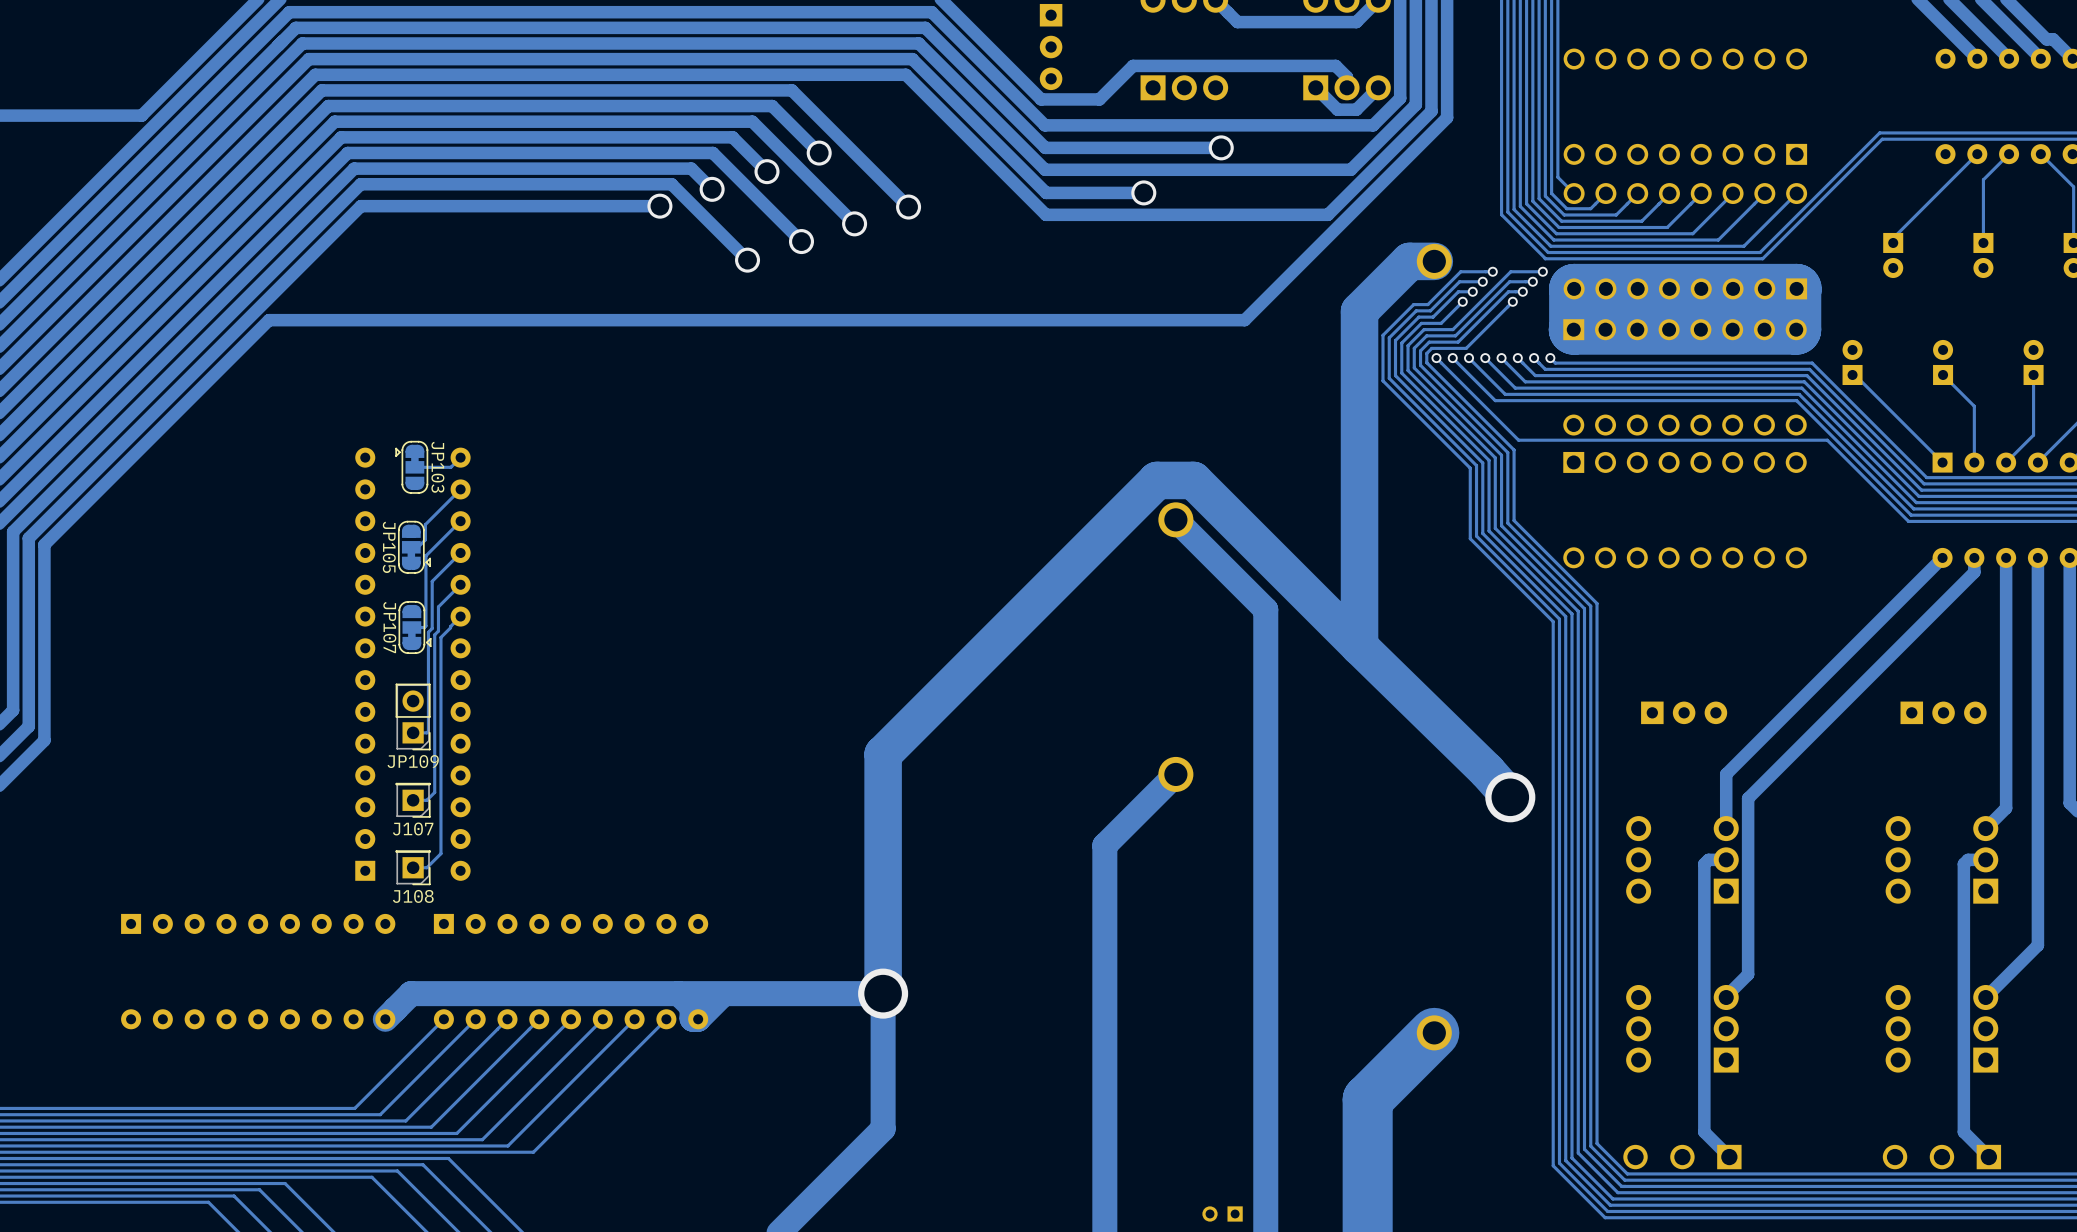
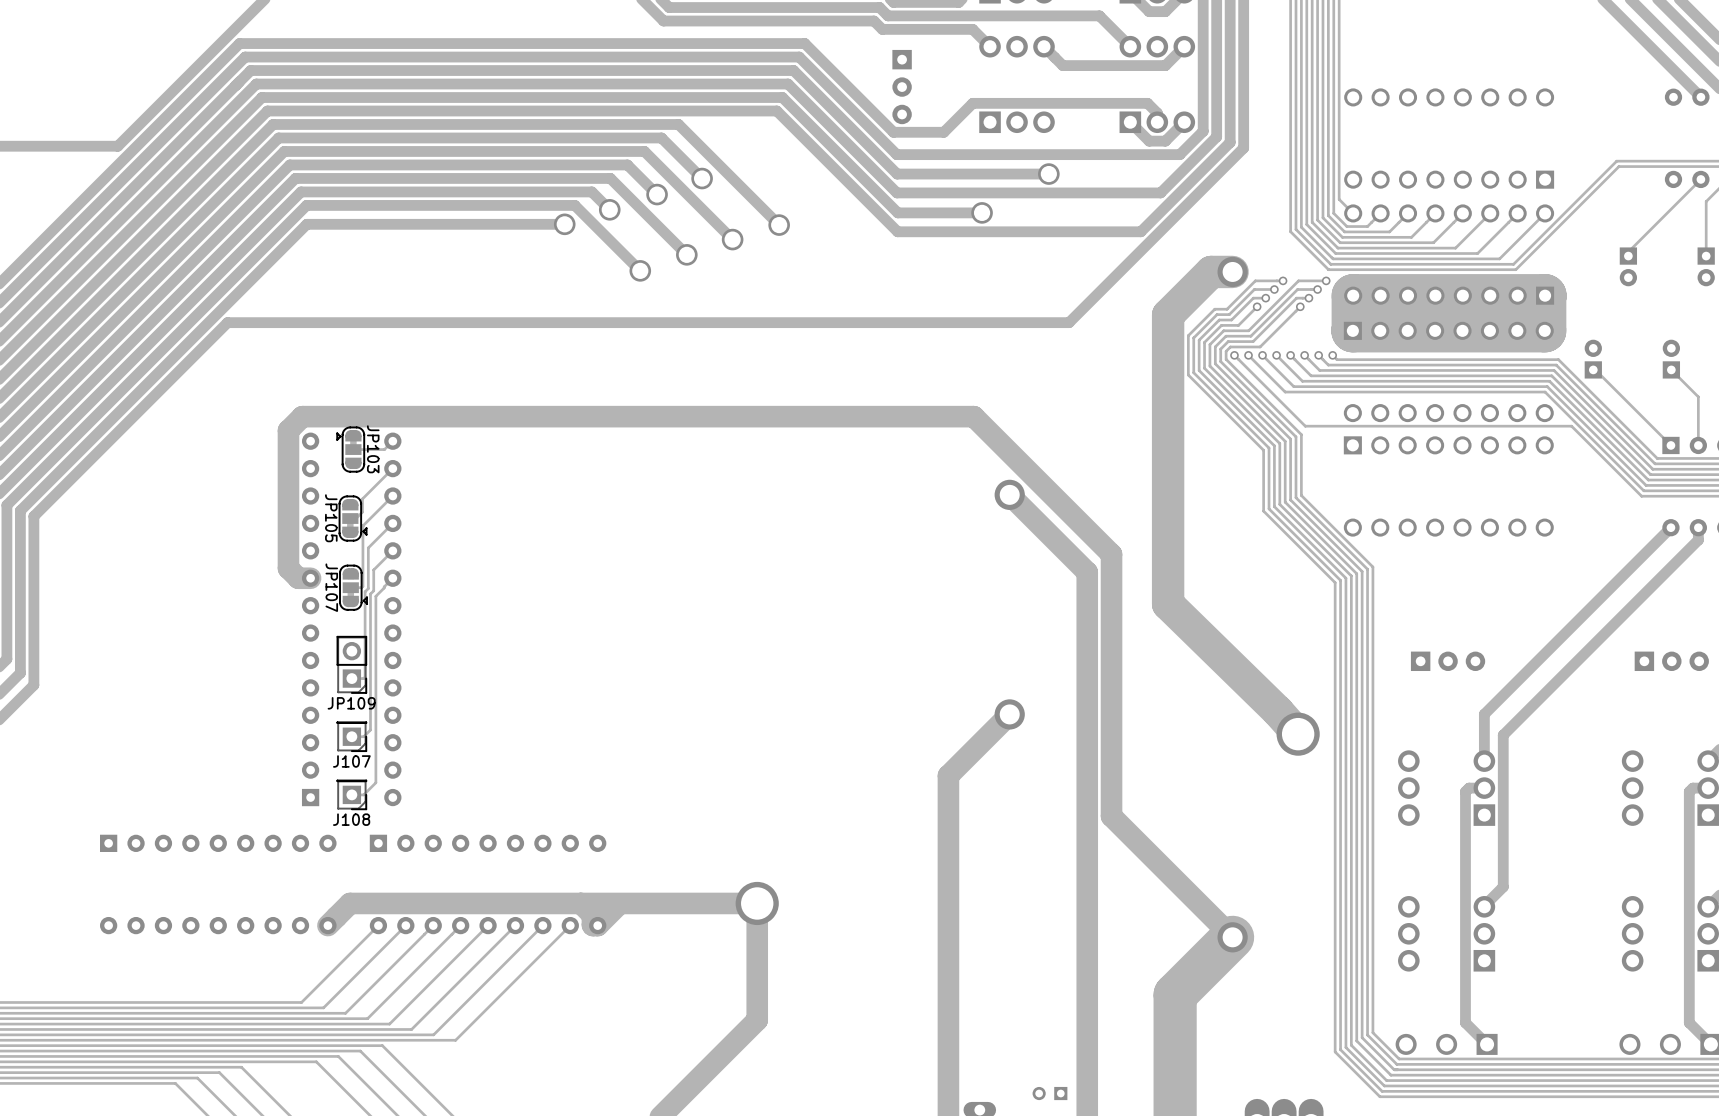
track: none -> (310, 578) (298, 578) (288, 568) (288, 430) (302, 416) (973, 416) (1111, 554) (1111, 816) (1232, 937)
track: (1359, 646) (1193, 480) (1156, 480) (883, 754) (883, 993) -> none

